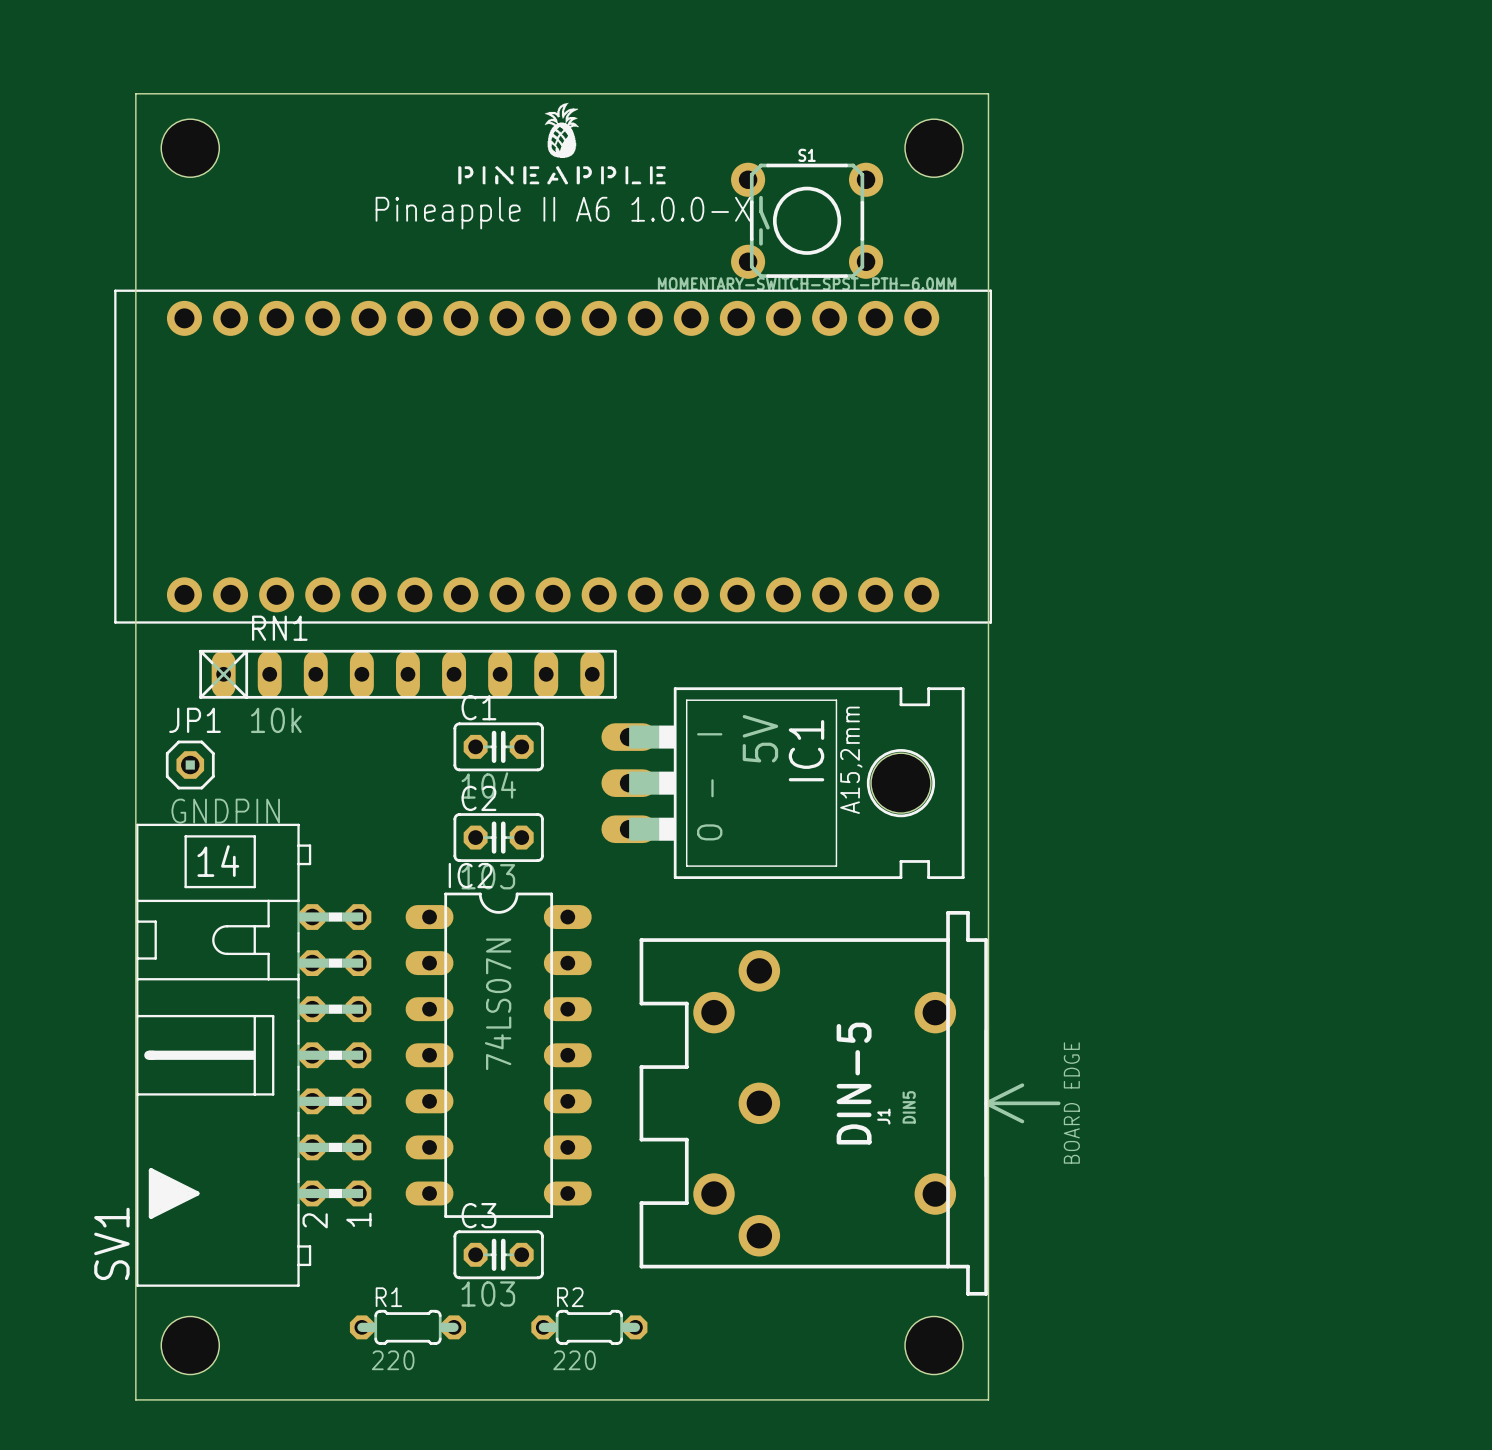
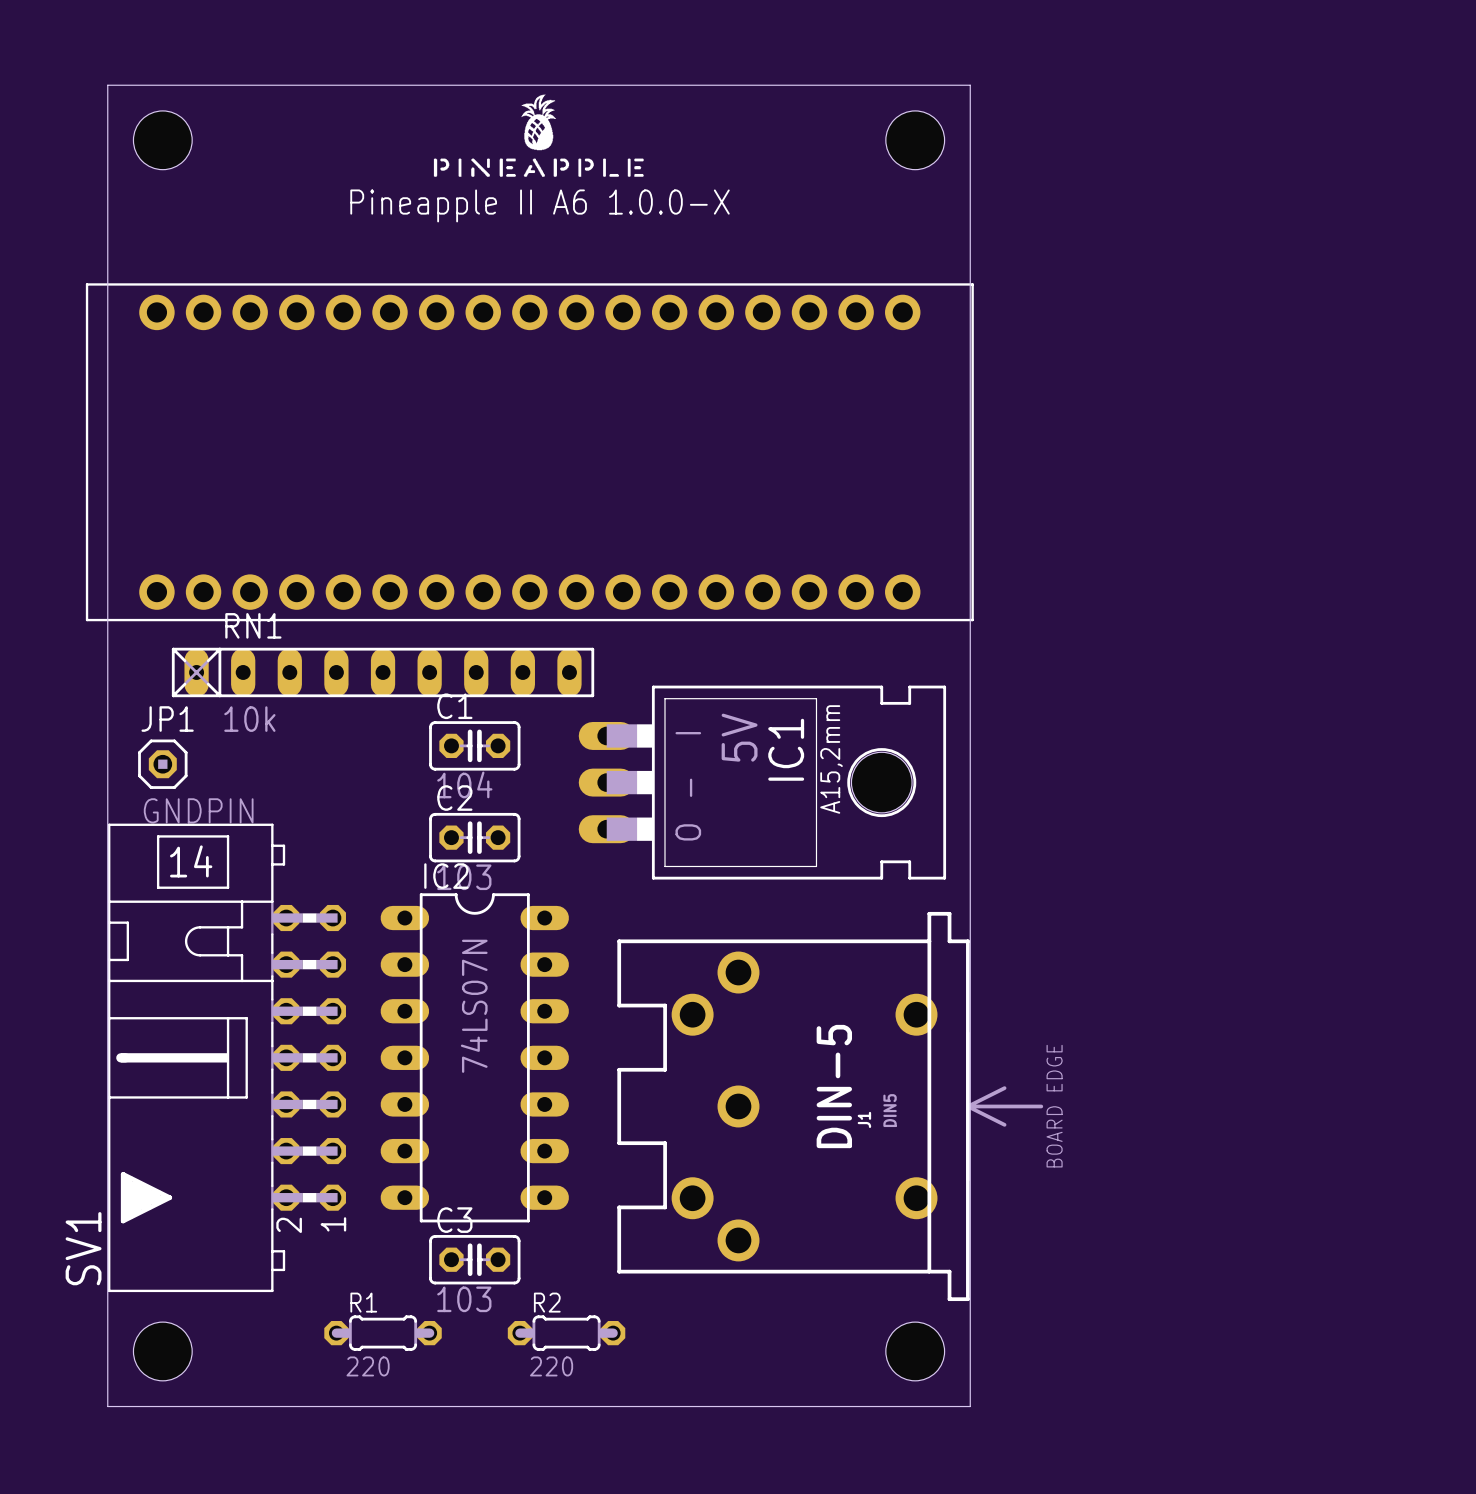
S1: MOMENTARY-SWITCH-SPST-PTH-6.0MM (807, 220) -> none

